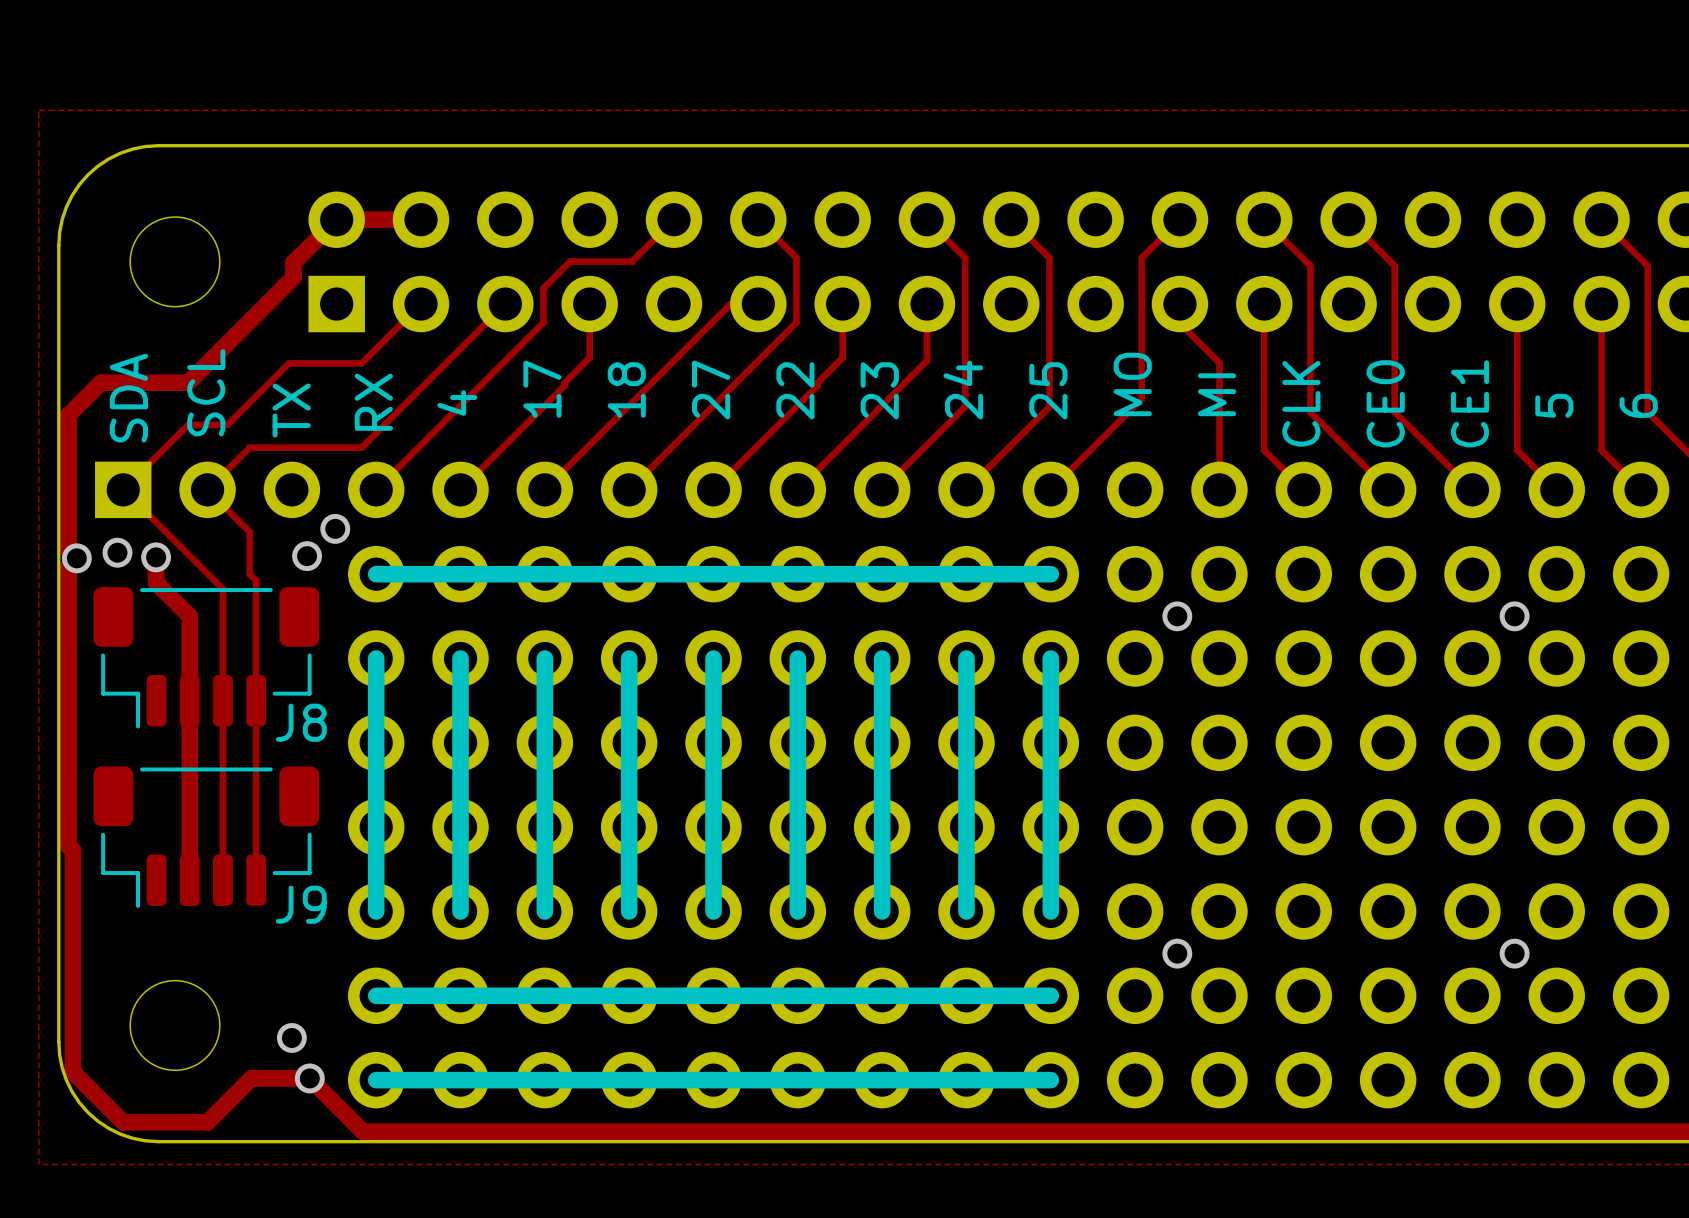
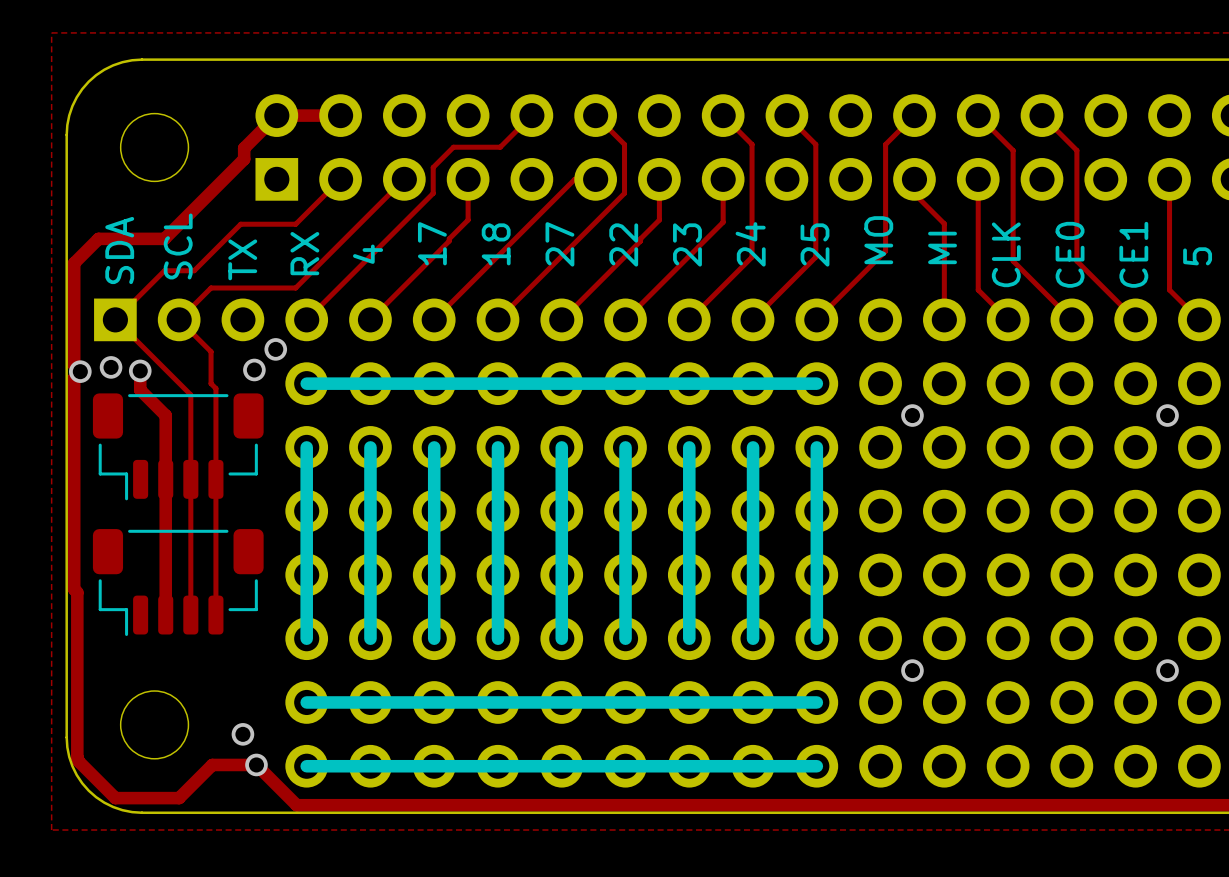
J8 name: J8 (301, 722) -> none
J9 name: J9 (301, 904) -> none

